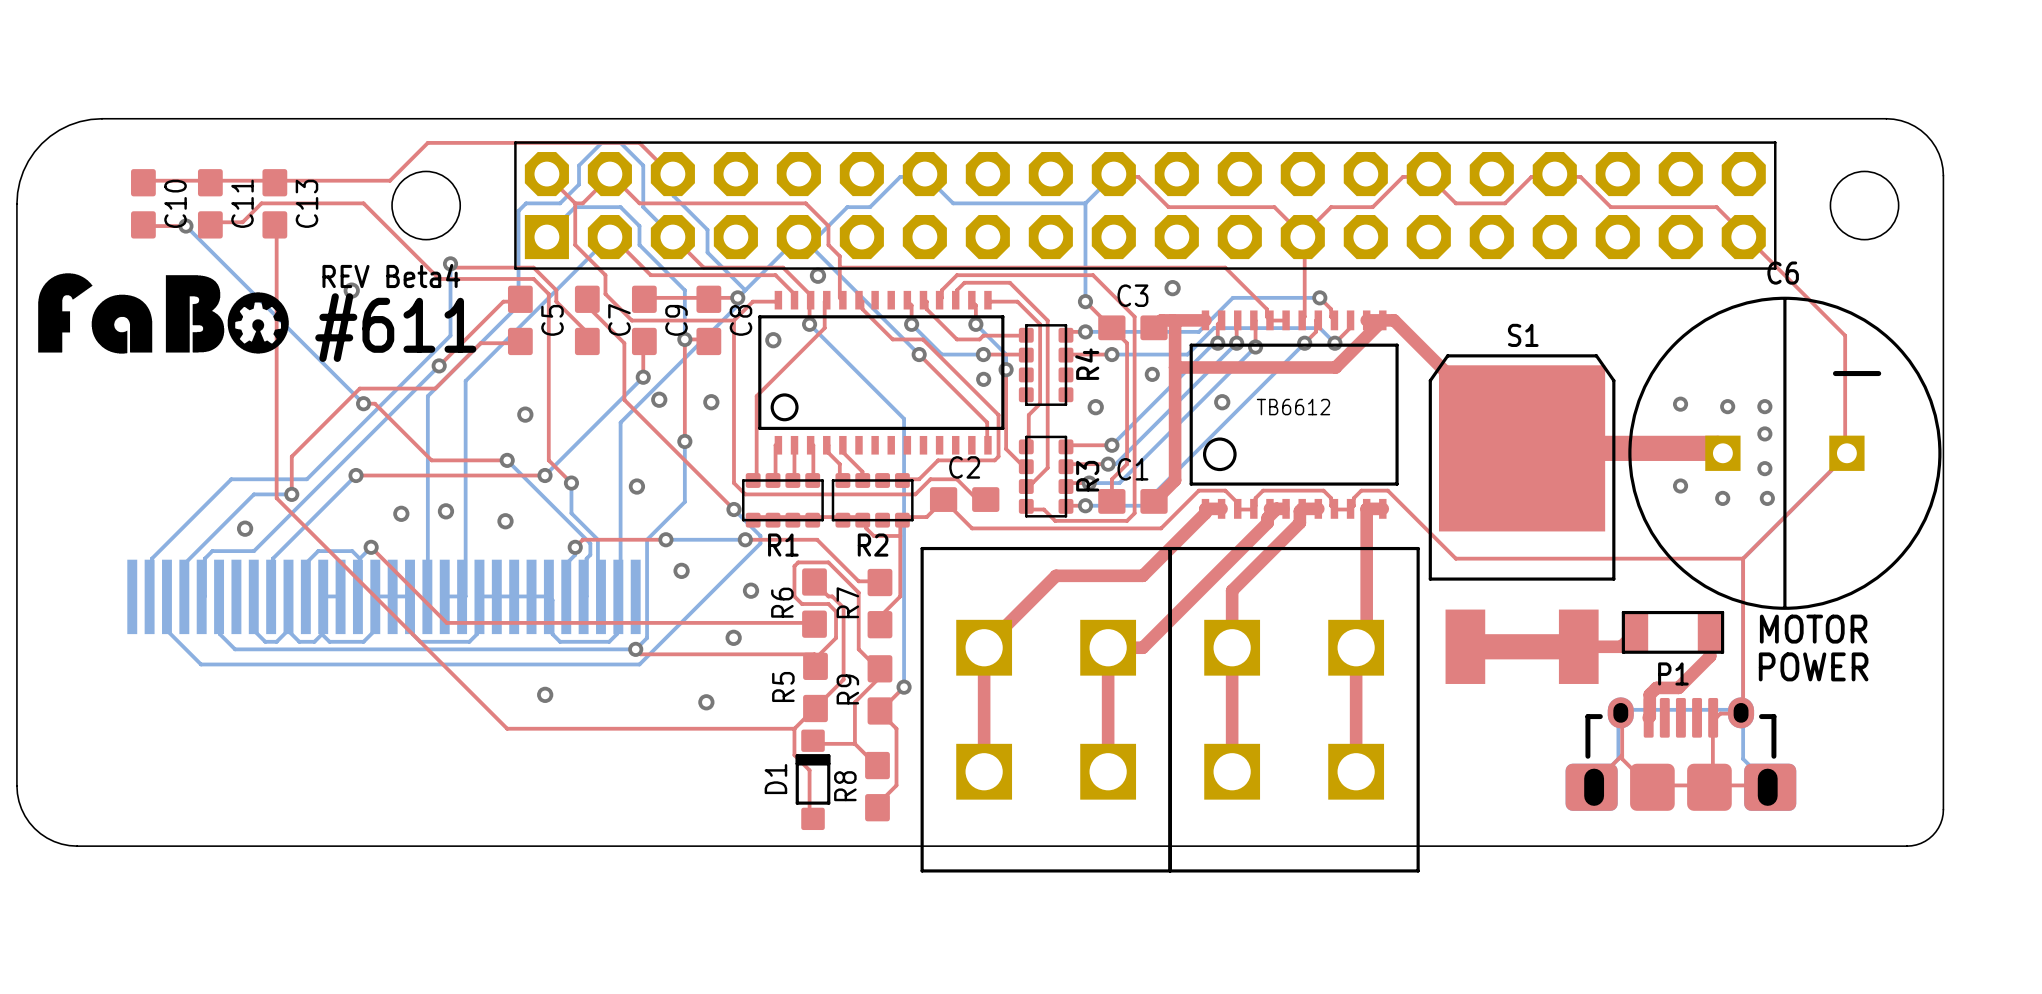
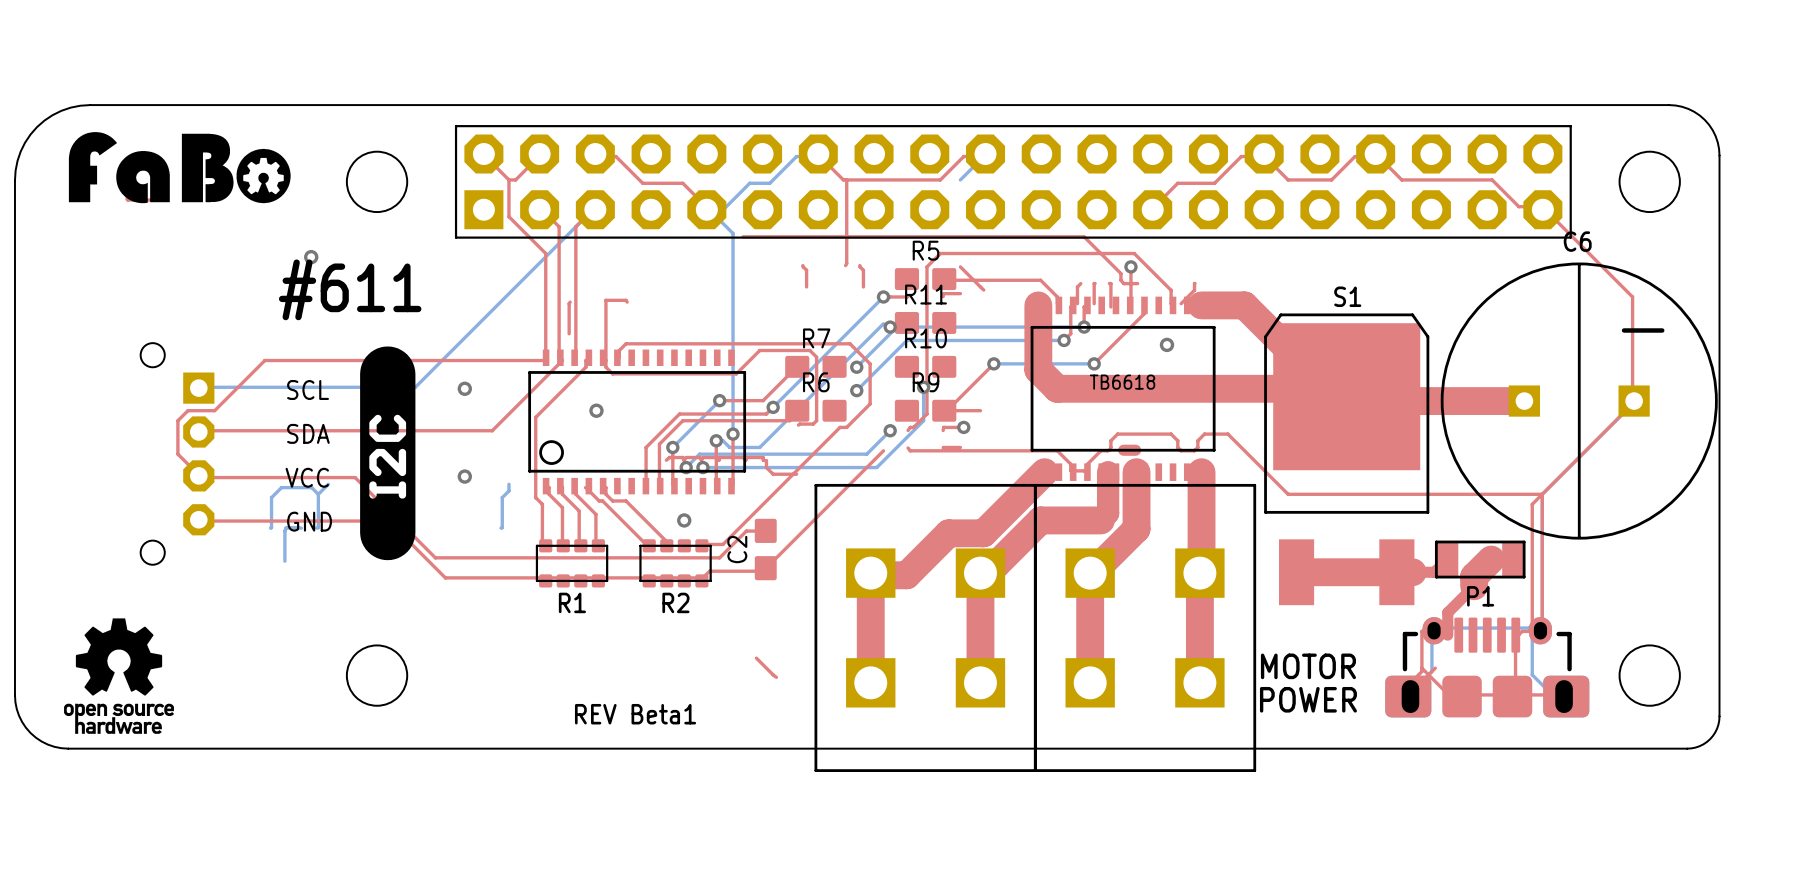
part footprint: [16, 118, 1944, 847] -> [14, 105, 1720, 749]
top track: (609, 174) (639, 203) (805, 203) (828, 226) (828, 244) (839, 256) (839, 297) (842, 300) -> none
top track: (672, 174) (639, 142) (427, 142) (390, 180) (276, 180) (274, 182) (272, 180) (212, 180) (210, 182) (208, 180) (144, 180) (143, 182) -> (595, 154) (595, 156) (615, 156) (642, 183) (682, 183) (706, 206) (706, 209)
bottom track: (672, 174) (673, 195) (707, 229) (707, 252) (745, 290) -> none
bottom track: (924, 174) (953, 203) (1085, 203) (1085, 301) -> none
top track: (1113, 174) (1115, 176) (1138, 176) (1168, 207) (1274, 207) (1304, 237) (1304, 316) (1302, 320) -> (985, 154) (983, 156) (963, 156) (940, 179) (843, 179) (818, 154)
top track: (1557, 176) (1580, 176) (1610, 207) (1716, 207) (1743, 233) -> (1378, 156) (1401, 179) (1492, 179) (1518, 206) (1542, 206)
C10: (143, 203) -> none
C11: (210, 203) -> none
C13: (274, 203) -> none
top track: (210, 224) (212, 222) (242, 222) (261, 203) (363, 203) (439, 278) (533, 278) (548, 294) (548, 460) (571, 483) -> none
top track: (274, 224) (276, 226) (276, 498) (507, 728) (794, 728) -> none
bottom track: (185, 226) (363, 403) -> none
via: (185, 226) -> none
bottom track: (546, 237) (575, 207) (620, 207) (639, 226) (639, 244) (684, 290) (684, 339) -> none
bottom track: (609, 237) (465, 381) (465, 596) (444, 596) -> none
top track: (672, 237) (703, 267) (783, 267) (809, 294) (809, 324) -> (595, 209) (592, 210) (575, 226) (574, 357)
bottom track: (672, 237) (643, 207) (643, 165) (620, 142) (601, 142) (579, 165) (579, 184) (560, 203) (526, 203) (518, 210) (518, 305) (427, 396) (427, 596) -> (595, 209) (592, 210) (415, 387) (198, 388)
bottom track: (798, 237) (737, 297) (737, 305) (620, 422) (620, 596) (616, 600) (616, 634) (609, 641) (560, 641) (552, 634) (552, 600) (548, 596) -> none
top track: (631, 256) (650, 275) (775, 275) (794, 294) (794, 300) -> (559, 226) (559, 357) (562, 360) (492, 430) (198, 432)
top track: (450, 263) (454, 267) (533, 267) (556, 290) (556, 301) (586, 331) (587, 341) -> none
bottom track: (450, 263) (450, 335) (306, 479) (231, 479) (151, 558) (151, 596) (149, 596) -> none
via: (450, 263) -> none
bottom track: (828, 263) (919, 354) -> (733, 233) (733, 434)
top track: (605, 275) (605, 294) (631, 320) (733, 320) -> (535, 243) (545, 253) (545, 360) (264, 360) (214, 410) (187, 410) (177, 420) (177, 454) (201, 477) (355, 477) (435, 557) (719, 557) (746, 531) (765, 530)
via: (817, 275) -> none
text: REV Beta4 (391, 276) -> none
via: (1172, 288) -> none
top track: (956, 290) (964, 282) (1009, 282) (1047, 320) -> (846, 256) (846, 179)
top track: (737, 297) (644, 299) -> none
via: (737, 297) -> none
top track: (1319, 297) (1331, 309) (1331, 316) (1334, 320) -> none
bottom track: (1319, 297) (1232, 297) (1198, 331) (1085, 331) -> none
via: (1319, 297) -> none
top track: (520, 299) (518, 301) (503, 301) (439, 365) -> none
top track: (587, 299) (590, 301) (590, 309) (624, 343) (624, 399) (733, 509) -> none
top track: (778, 300) (752, 301) (733, 320) -> none
top track: (826, 300) (824, 301) (824, 328) (756, 396) (756, 479) (753, 480) -> none
top track: (858, 300) (862, 301) (862, 309) (892, 339) (922, 339) (998, 415) (998, 456) (994, 460) (938, 460) (922, 475) -> (605, 367) (612, 373) (736, 373) (759, 350) (809, 350) (816, 357) (816, 420)
top track: (923, 300) (926, 301) (926, 309) (956, 339) (979, 339) (983, 335) (998, 335) -> none
top track: (939, 300) (941, 297) (941, 290) (956, 275) (1093, 275) (1134, 316) (1134, 513) (1127, 520) (1055, 520) (1043, 509) -> none
top track: (987, 300) (1017, 301) (1040, 324) (1040, 403) (1028, 415) (1028, 445) (1026, 446) -> none
via: (1085, 301) -> none
top track: none -> (1130, 266) (1130, 305)
via: none -> (1130, 266)
drawing position: (163, 313) -> (179, 167)
top track: none -> (944, 279) (1040, 280) (1057, 296) (1058, 305)
C5: (520, 320) -> none
C7: (587, 320) -> none
C9: (644, 320) -> none
C8: (708, 320) -> none
top track: (733, 320) (733, 483) (745, 494) (915, 494) (930, 479) (956, 479) (975, 498) (985, 499) -> none
top track: none -> (926, 283) (926, 266) (940, 253) (1134, 253) (1171, 290) (1171, 303) (1173, 305)
top track: (1172, 320) (1175, 322) (1175, 480) (1154, 501) -> none
top track: (1205, 320) (1161, 320) (1154, 327) -> none
top track: (1318, 320) (1316, 320) (1316, 331) (1304, 343) -> none
top track: (1366, 320) (1394, 320) (1522, 448) (1717, 448) (1722, 453) -> (1386, 410) (1396, 401) (1524, 401)
top track: (1382, 320) (1335, 367) (1175, 367) -> none
bottom track: (809, 324) (904, 418) (904, 687) -> none
via: (809, 324) -> none
bottom track: (911, 324) (941, 354) (983, 354) -> none
via: (911, 324) -> none
bottom track: (975, 324) (1006, 354) (1006, 369) -> none
via: (975, 324) -> none
C3: (1132, 327) -> none
top track: (1111, 328) (1127, 343) (1127, 464) (1111, 479) (1111, 501) -> none
via: (1085, 331) -> none
bottom track: none -> (883, 296) (773, 407)
via: none -> (883, 296)
via: (684, 339) -> none
via: (773, 340) -> none
top track: (520, 341) (518, 343) (480, 343) (435, 388) (359, 388) (291, 456) (291, 494) -> none
bottom track: (1217, 343) (1213, 343) (1111, 445) -> none
via: (1217, 343) -> none
bottom track: (1236, 343) (1115, 464) (1108, 464) -> none
via: (1236, 343) -> none
bottom track: (1304, 343) (1142, 505) (1085, 505) -> none
via: (1304, 343) -> none
bottom track: (1334, 343) (1319, 328) (1213, 328) (1187, 354) (1111, 354) -> none
via: (1334, 343) -> none
top track: none -> (1044, 305) (1047, 303) (1038, 305) (1038, 369) (1057, 388) (1327, 388)
top track: none -> (1073, 305) (1070, 307) (1070, 333) (1064, 340)
top track: none -> (1087, 305) (1084, 307) (1084, 327)
top track: none -> (1144, 305) (1144, 313) (1094, 363)
top track: none -> (1187, 305) (1187, 303) (1244, 305) (1335, 396) (1348, 400) (1378, 400) (1387, 409)
bottom track: (1255, 347) (1119, 483) (1089, 483) -> none
via: (1255, 347) -> none
top track: (919, 354) (987, 422) (987, 445) -> none
via: (919, 354) -> none
top track: (983, 354) (1026, 355) -> none
via: (983, 354) -> none
top track: (1111, 354) (1065, 355) -> none
via: (1111, 354) -> none
bottom track: (439, 365) (253, 551) (212, 551) (204, 558) (204, 596) (201, 596) -> none
via: (439, 365) -> none
bottom track: none -> (883, 323) (759, 447) (729, 447) (722, 440) (716, 440)
R4: (1046, 365) -> none
R11: none -> (925, 322)
top track: (1006, 369) (1006, 449) (1026, 466) -> none
bottom track: none -> (1084, 327) (896, 327) (856, 367)
via: none -> (1084, 327)
part position: (881, 372) -> (637, 421)
via: (1152, 374) -> none
bottom track: (643, 377) (545, 475) -> none
via: (643, 377) -> none
via: (983, 379) -> none
bottom track: none -> (1064, 340) (906, 340) (856, 390)
via: none -> (1064, 340)
via: none -> (1166, 344)
drawing: none -> [360, 346, 416, 561]
via: (659, 399) -> none
via: (711, 402) -> none
via position: (1222, 402) -> (1094, 363)
top track: (363, 403) (374, 403) (431, 460) (507, 460) -> none
via: (363, 403) -> none
top track: none -> (588, 357) (585, 360) (585, 367) (535, 417) (535, 497) (542, 504) (542, 544) (545, 545)
top track: none -> (617, 357) (619, 357) (619, 350) (626, 343) (850, 343) (870, 363) (870, 404) (846, 427) (840, 427) (722, 544) (701, 545)
via: (1680, 404) -> none
via: (1727, 406) -> none
via: (1764, 406) -> none
via: (1095, 407) -> none
top track: none -> (993, 363) (947, 410) (944, 410)
bottom track: none -> (993, 363) (1094, 363)
via: none -> (993, 363)
via position: (525, 414) -> (464, 388)
top track: none -> (797, 366) (763, 400) (719, 400)
R10: none -> (925, 366)
part: (1294, 414) -> none
top track: (684, 415) (684, 441) -> none
via: none -> (856, 367)
via: (1764, 433) -> none
bottom track: none -> (923, 387) (923, 420) (876, 467) (702, 467)
via: none -> (923, 387)
part: none -> (1123, 388)
text: none -> SCL (308, 390)
bottom track: (684, 441) (684, 501) (647, 539) (647, 638) (635, 649) (235, 649) (219, 634) (219, 596) -> none
via: (684, 441) -> none
via: none -> (856, 390)
top track: (778, 445) (775, 445) (775, 479) (773, 480) -> none
top track: (794, 445) (794, 479) (792, 480) -> none
top track: (810, 445) (813, 445) (812, 480) -> none
top track: (826, 445) (828, 445) (828, 452) (839, 464) (839, 479) (842, 480) -> none
top track: (842, 445) (843, 452) (862, 471) (862, 480) -> none
top track: (1111, 445) (1066, 445) (1065, 446) -> none
via: (1111, 445) -> none
bottom track: none -> (719, 400) (672, 447)
via: none -> (719, 400)
bottom track: (507, 460) (590, 543) (590, 554) (586, 558) (586, 596) (583, 596) -> none
via: (507, 460) -> none
top track: none -> (773, 407) (766, 414) (679, 414) (646, 447) (645, 486)
via: none -> (773, 407)
via: none -> (596, 410)
top track: none -> (797, 410) (789, 420) (682, 420) (659, 444) (660, 486)
via: (1108, 464) -> none
via: (1764, 468) -> none
top track: (356, 475) (545, 475) -> none
bottom track: (356, 475) (272, 558) (272, 596) (271, 596) -> none
via: (356, 475) -> none
via: (545, 475) -> none
R3: (1046, 476) -> none
bottom track: (571, 483) (571, 513) (597, 539) (597, 596) (600, 596) -> none
via: (571, 483) -> none
via: (636, 486) -> none
bottom track: none -> (890, 430) (866, 454) (699, 454) (686, 467)
via: none -> (890, 430)
via: (1680, 486) -> none
text: none -> SDA (308, 433)
top track: none -> (733, 434) (731, 486)
via: none -> (733, 434)
bottom track: (291, 494) (253, 494) (185, 562) (185, 596) (184, 596) -> none
via: (291, 494) -> none
top track: none -> (716, 440) (717, 486)
via: none -> (716, 440)
via: (1722, 498) -> none
via: (1767, 498) -> none
C2 rotation: 0° (964, 499) -> 90° clockwise (765, 549)
C2 position: (964, 499) -> (765, 549)
R1 position: (782, 500) -> (572, 563)
R2 position: (872, 500) -> (675, 563)
C1: (1132, 501) -> none
top track: none -> (672, 447) (672, 484) (674, 486)
via: none -> (672, 447)
via: (1085, 505) -> none
top track: (1221, 508) (1205, 508) (1205, 513) (1142, 575) (1056, 575) (984, 647) (984, 650) -> (1058, 472) (1044, 472) (983, 533) (948, 533) (906, 575) (870, 575)
top track: (1276, 508) (1267, 518) (1267, 522) (1142, 647) (1108, 647) (1108, 650) -> (1100, 520) (1040, 520) (996, 564) (991, 564) (980, 575)
top track: (1318, 508) (1302, 508) (1299, 511) (1299, 522) (1232, 590) (1232, 650) -> (1130, 472) (1136, 472) (1136, 528) (1090, 575)
top track: (1382, 508) (1366, 508) (1366, 637) (1356, 647) (1356, 650) -> (1187, 472) (1201, 472) (1201, 573) (1199, 575)
bottom track: (733, 509) (760, 535) (760, 543) (639, 664) (201, 664) (167, 630) (166, 596) -> none
via: (733, 509) -> none
top track: none -> (883, 450) (763, 571) (709, 571) (701, 580) (699, 577) (686, 577) (684, 580) (682, 577) (669, 577) (666, 580) (666, 577) (649, 577) (649, 580) (646, 577) (599, 577) (598, 580) (595, 577) (582, 577) (580, 580) (579, 577) (565, 577) (563, 580) (562, 577) (545, 577) (545, 580) (542, 577) (445, 577) (388, 521) (198, 519)
top track: (1244, 509) (1237, 508) (1236, 501) (1225, 490) (1198, 490) (1161, 528) (972, 528) (943, 499) (926, 517) (904, 517) (900, 520) (900, 596) (881, 615) (879, 624) -> (1100, 450) (1087, 464) (1087, 472) (1070, 470) (1070, 464) (1057, 450) (923, 450)
via: (445, 511) -> none
part: none -> (177, 453)
via: (401, 513) -> none
via position: (505, 521) -> (464, 476)
via: (245, 528) -> none
via: none -> (686, 467)
via: none -> (702, 467)
top track: none -> (1101, 472) (1108, 472) (1108, 513) (1101, 520)
text: none -> VCC (307, 477)
top track: (665, 539) (582, 539) (575, 547) -> none
bottom track: (665, 539) (745, 539) -> none
via: (665, 539) -> none
top track: (745, 539) (817, 539) (858, 581) (879, 582) -> none
via: (745, 539) -> none
top track: (371, 547) (446, 622) (814, 624) -> none
via: (371, 547) -> none
via: (575, 547) -> none
top track: none -> (546, 486) (549, 487) (549, 494) (562, 507) (563, 545)
top track: none -> (560, 486) (562, 487) (562, 494) (579, 511) (579, 544) (580, 545)
top track: none -> (574, 486) (575, 494) (595, 514) (595, 544) (598, 545)
top track: none -> (588, 486) (585, 487) (649, 545)
top track: none -> (603, 486) (605, 487) (605, 494) (612, 500) (626, 500) (666, 541) (666, 545)
top track: none -> (1542, 494) (1532, 504) (1532, 628) (1528, 631)
via: (681, 570) -> none
top track: (814, 582) (828, 596) (832, 596) (843, 607) (843, 679) (794, 728) -> none
text: none -> GND (309, 521)
via position: (751, 590) -> (684, 520)
bottom track: (253, 596) (253, 630) (265, 641) (276, 641) (287, 630) -> none
part: (383, 596) -> none
bottom track: (548, 596) (479, 596) (476, 600) (476, 634) (469, 641) (420, 641) (412, 634) (412, 600) (408, 596) (375, 596) (374, 630) (363, 641) (329, 641) (322, 634) (314, 641) (299, 641) (287, 630) -> none
R6 rotation: 0° (814, 603) -> 90° clockwise (815, 410)
R6 position: (814, 603) -> (815, 410)
R7 rotation: 0° (879, 603) -> 90° clockwise (815, 366)
R7 position: (879, 603) -> (815, 366)
text position: MOTOR (1813, 629) -> MOTOR (1308, 666)
top track: none -> (1491, 559) (1474, 576) (1474, 586) (1447, 612) (1447, 635)
top track: (1710, 632) (1710, 656) (1678, 687) (1656, 687) (1649, 694) (1648, 717) -> none
via: (733, 637) -> none
top track width: thin (1465, 646) (1596, 646) -> thick (1296, 572) (1412, 572)
top track: (635, 649) (640, 654) (814, 654) (817, 656) -> none
via: (635, 649) -> none
top track width: thin (984, 650) (984, 771) -> thick (870, 575) (870, 682)
top track width: thin (1108, 650) (1108, 771) -> thick (980, 575) (980, 682)
top track width: thin (1232, 650) (1232, 771) -> thick (1090, 575) (1090, 682)
top track width: thin (1356, 650) (1356, 771) -> thick (1199, 575) (1199, 682)
top track: (817, 656) (836, 638) (836, 611) (828, 604) (802, 604) (794, 596) (794, 566) (798, 562) (828, 562) (858, 592) (858, 649) (879, 668) (877, 672) (877, 679) (854, 702) (854, 743) (813, 743) (813, 740) -> none
text position: POWER (1813, 666) -> POWER (1308, 699)
R5 rotation: 0° (815, 687) -> 90° clockwise (925, 279)
R5 position: (815, 687) -> (925, 279)
top track: (904, 687) (879, 710) (896, 728) (896, 785) (877, 804) (877, 807) -> none
via: (904, 687) -> none
R9 rotation: 0° (879, 689) -> 90° clockwise (925, 410)
R9 position: (879, 689) -> (925, 410)
via: (545, 694) -> none
drawing: none -> [64, 618, 174, 734]
via: (706, 702) -> none
top track: none -> (1423, 630) (1421, 671) (1397, 696)
top track: (1620, 712) (1622, 758) (1648, 785) (1652, 787) (1652, 785) -> (1421, 668) (1451, 696) (1462, 694)
bottom track: none -> (1529, 630) (1532, 631) (1532, 674) (1555, 696)
bottom track: (1741, 712) (1743, 713) (1743, 758) (1770, 787) -> none
top track: (794, 728) (794, 755) (809, 770) (809, 815) (813, 818) -> none
D1: (813, 779) -> none
R8: (877, 786) -> none
text: none -> REV Beta1 (635, 714)

